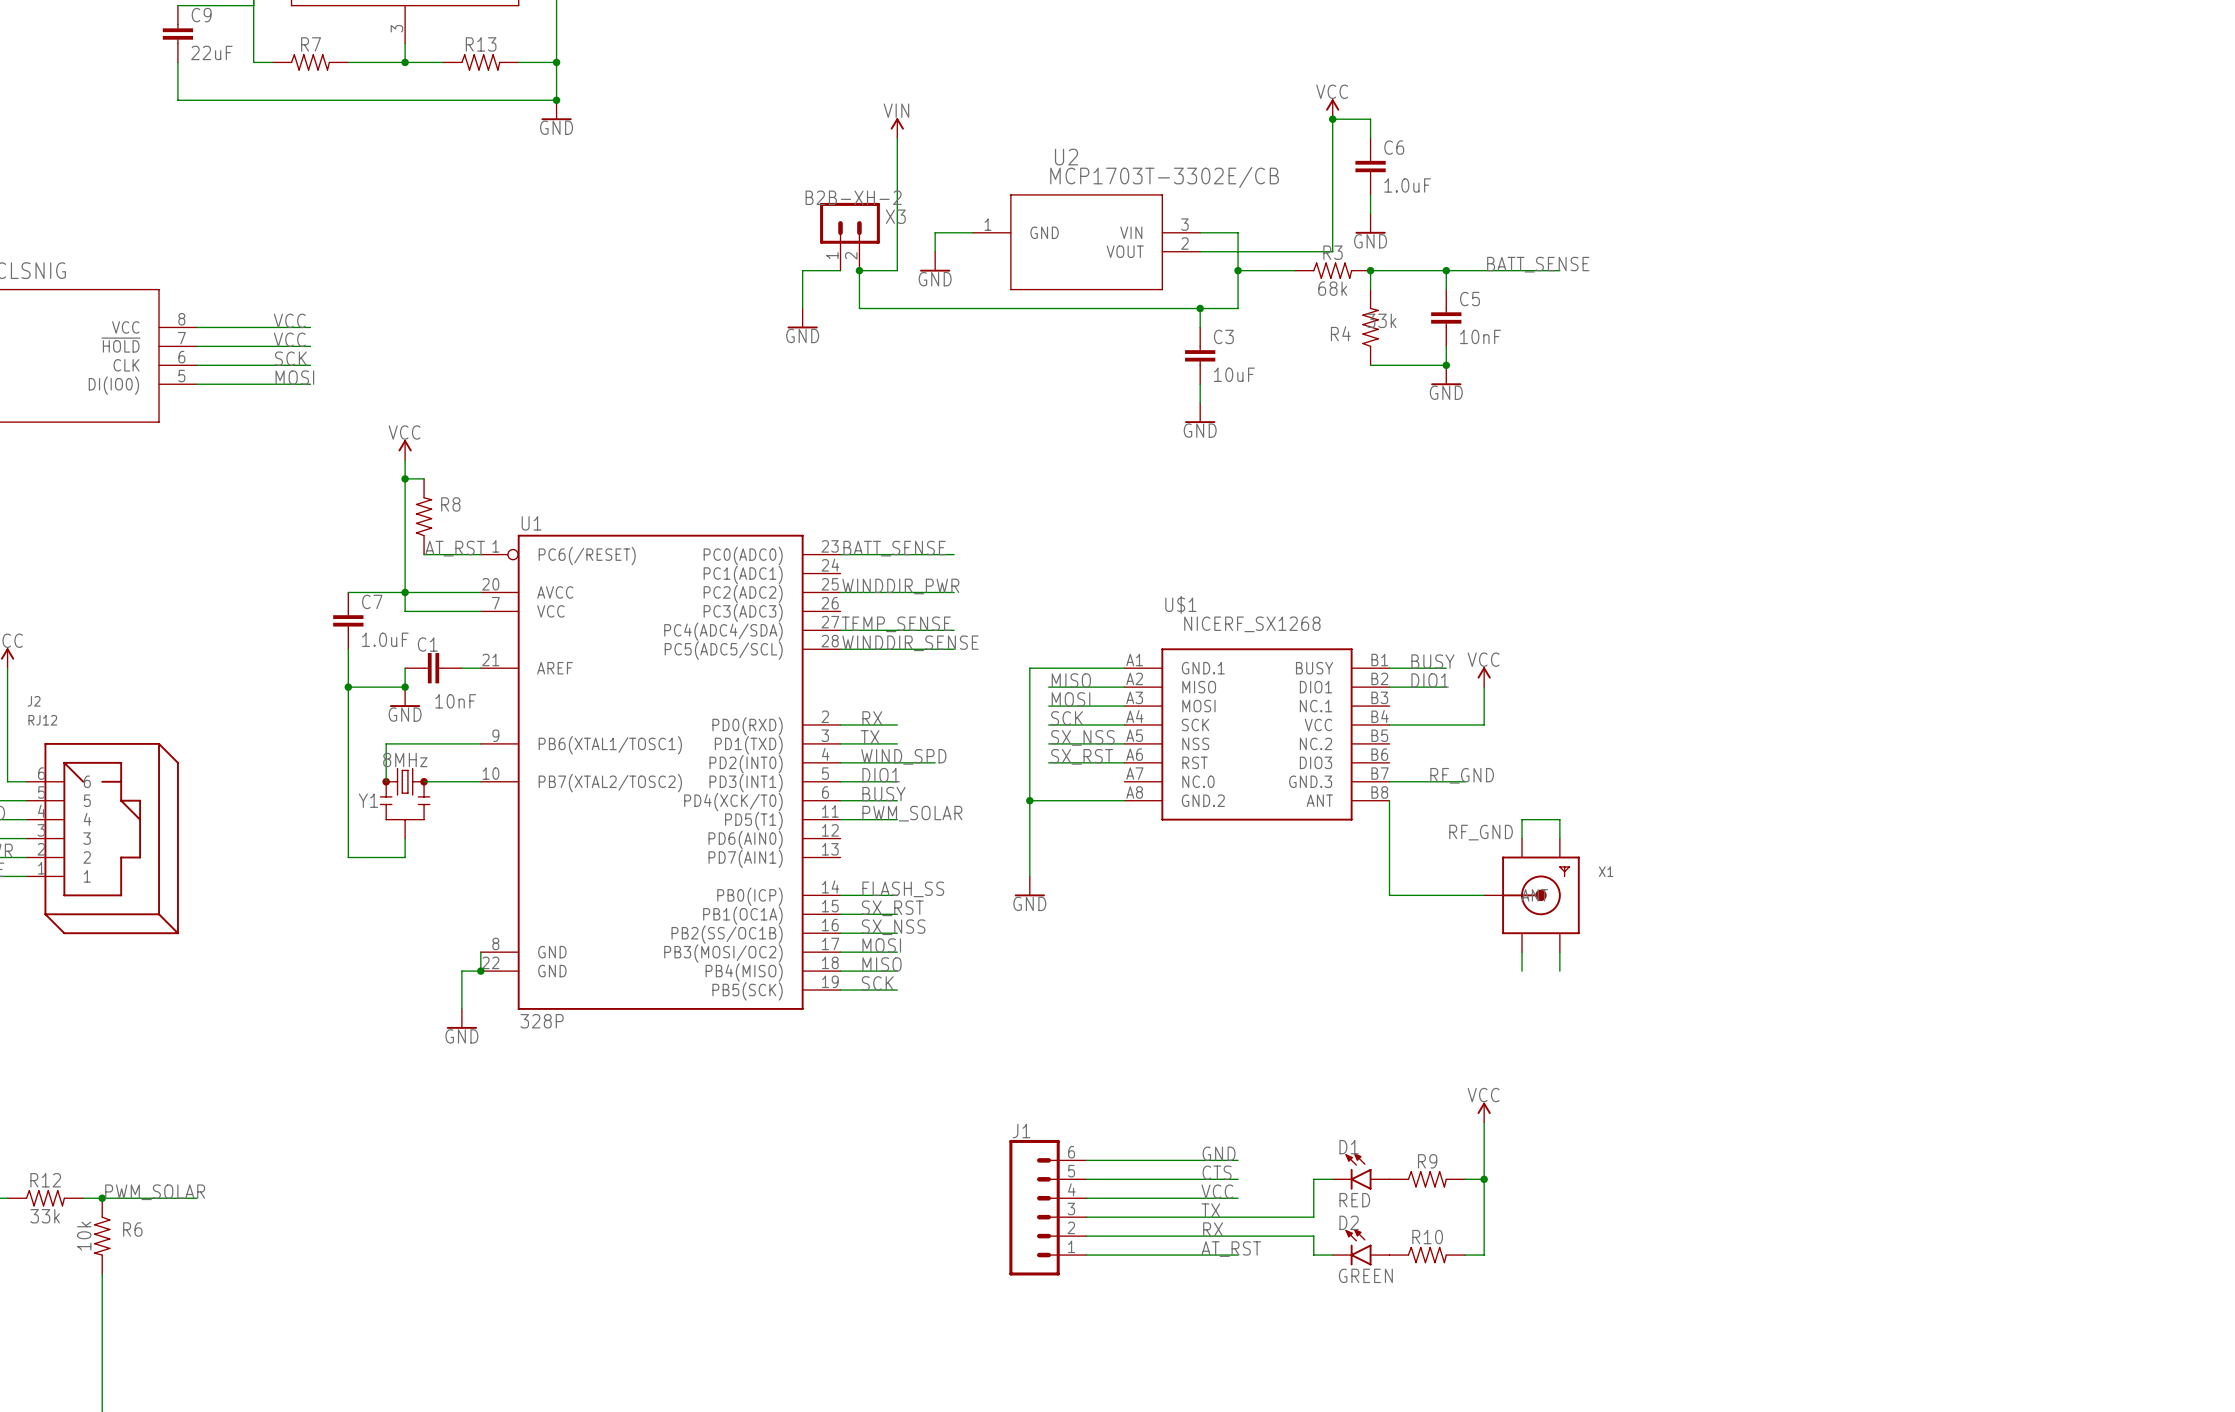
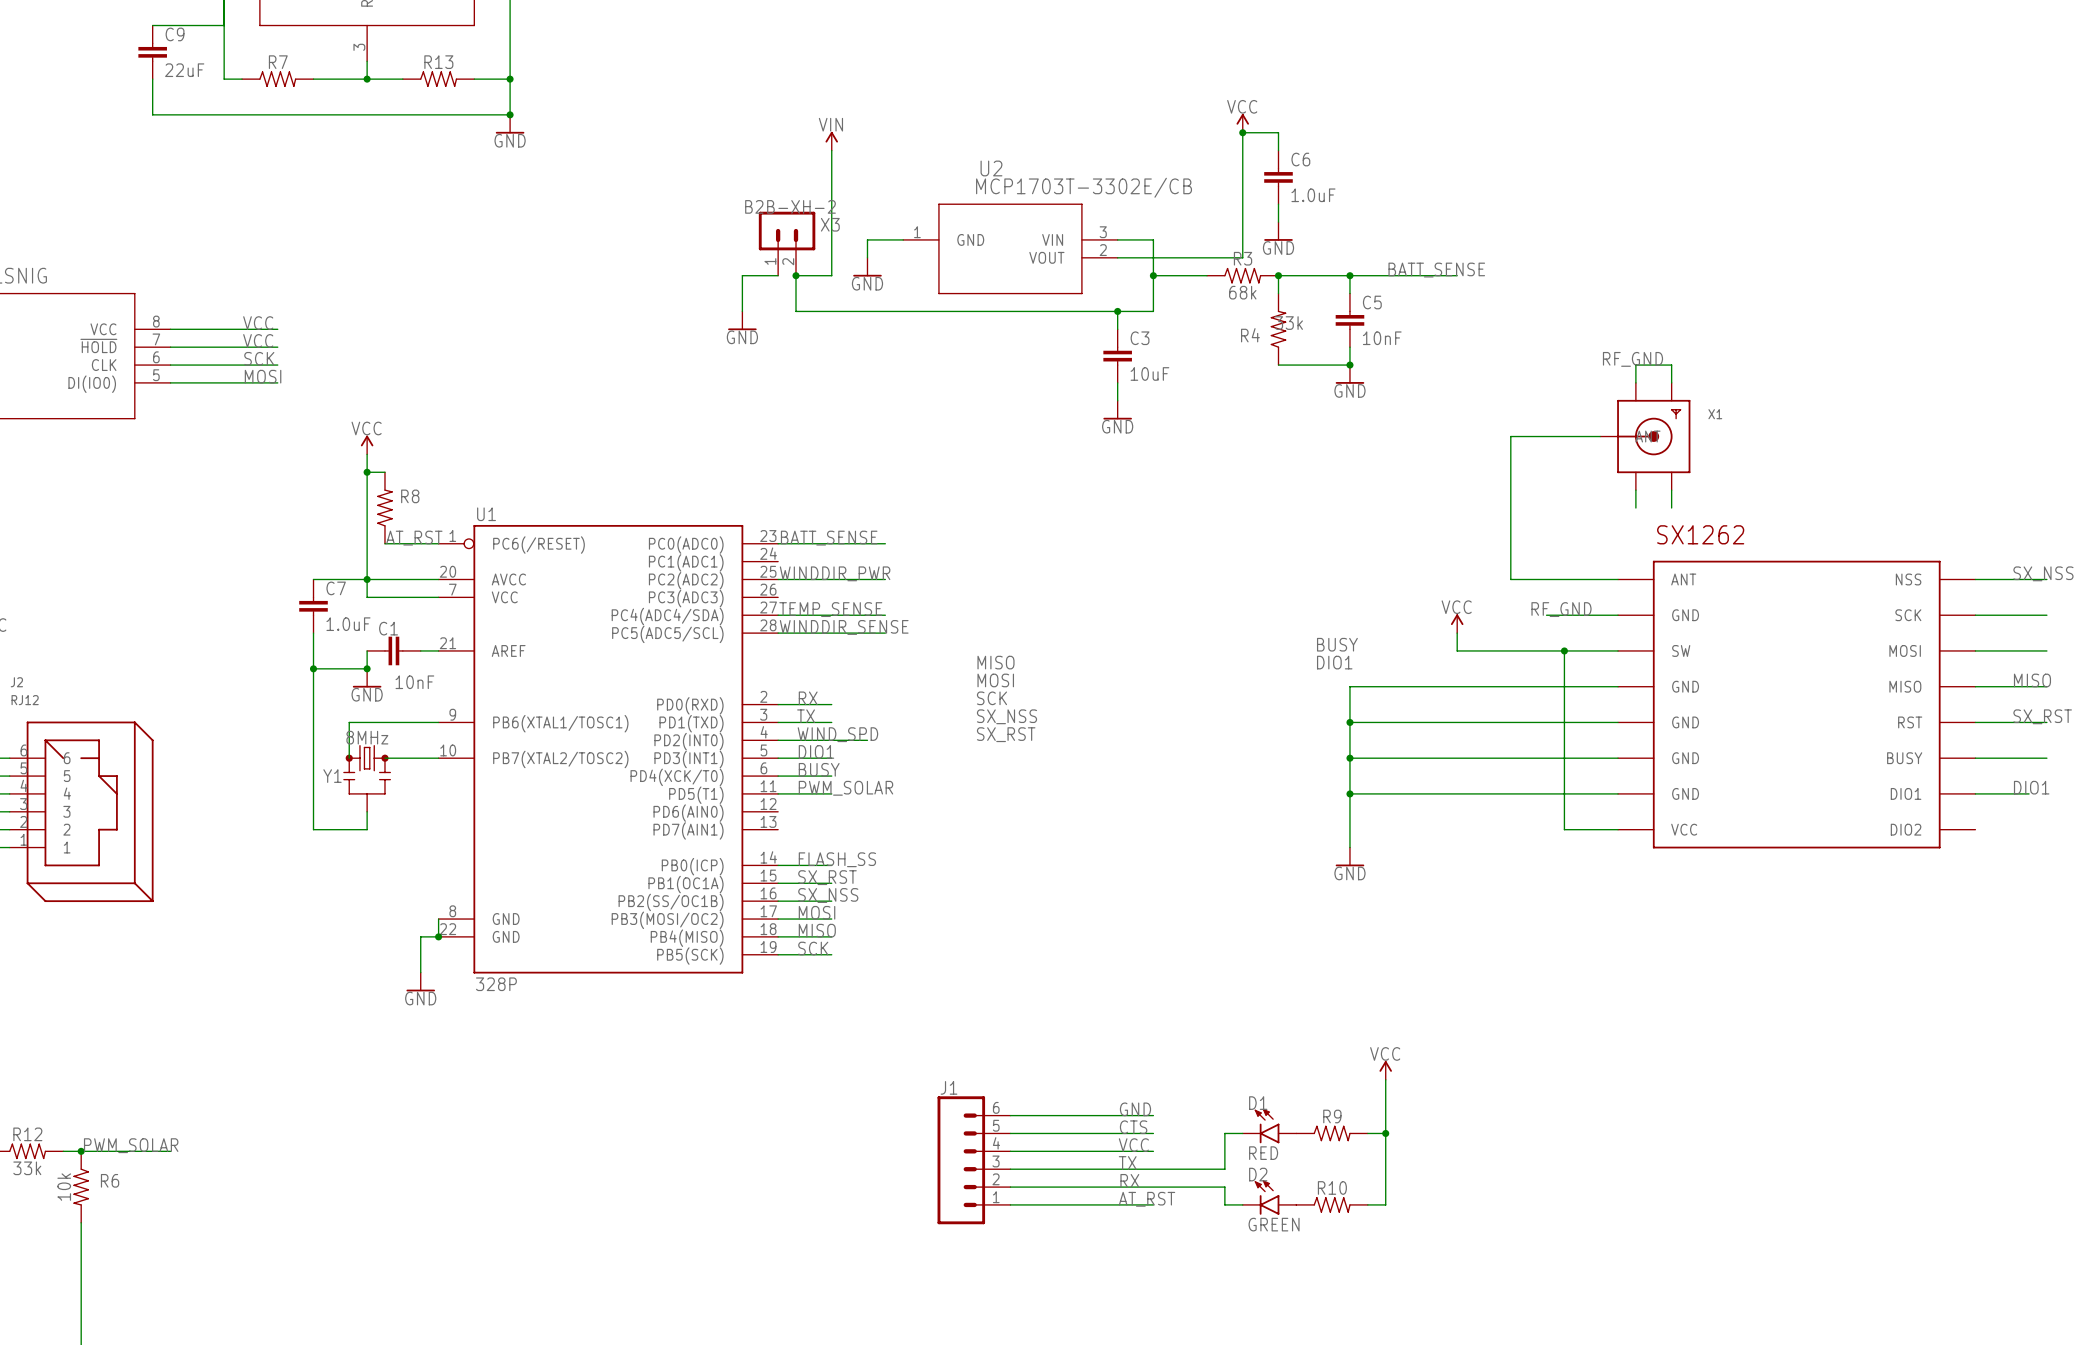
label: none -> RF_GND (1632, 359)
wire: none -> (1635, 382) (1635, 365) (1671, 365) (1671, 382)
wire: none -> (1600, 436) (1510, 436) (1510, 579) (1618, 579)
wire: none -> (1635, 490) (1635, 508)
wire: none -> (1671, 490) (1671, 508)
label: none -> SX_NSS (2043, 573)
wire: none -> (1975, 579) (2046, 579)
label: none -> RF_GND (1561, 609)
wire: none -> (1546, 615) (1618, 615)
wire: none -> (1975, 615) (2046, 615)
wire: none -> (1457, 633) (1457, 650) (1618, 650)
wire: (1124, 668) (1029, 668) (1029, 876) -> none
wire: (1389, 668) (1446, 668) -> none
wire: none -> (1564, 650) (1564, 829) (1618, 829)
junction: none -> (1564, 650)
wire: none -> (1975, 650) (2046, 650)
power symbol position: VCC (1484, 677) -> VCC (1457, 623)
wire: (1048, 687) (1124, 687) -> none
wire: (1389, 687) (1446, 687) -> none
wire: (1484, 687) (1484, 724) (1389, 724) -> none
label: none -> MISO (2032, 680)
wire: (1048, 706) (1124, 706) -> none
wire: none -> (1618, 686) (1349, 686) (1349, 847)
wire: none -> (1975, 686) (2046, 686)
wire: (1048, 724) (1124, 724) -> none
part: none -> (1796, 704)
U$1: NICERF_SX1268 (1256, 734) -> none
label: none -> SX_RST (2042, 716)
wire: (1048, 743) (1124, 743) -> none
wire: none -> (1349, 722) (1618, 722)
junction: none -> (1349, 722)
wire: none -> (1975, 722) (2046, 722)
wire: (1048, 762) (1124, 762) -> none
label: RF_GND (1462, 775) -> none
wire: (1389, 781) (1446, 781) -> none
junction: none -> (1349, 758)
wire: none -> (1367, 758) (1618, 758)
wire: none -> (1975, 758) (2046, 758)
wire: (1029, 800) (1124, 800) -> none
junction: (1029, 800) -> none
wire: (1389, 800) (1389, 895) (1484, 895) -> none
label: none -> DIO1 (2031, 787)
junction: none -> (1349, 793)
wire: (1522, 819) (1522, 838) -> (1421, 793) (1349, 793)
wire: (1559, 819) (1559, 838) -> (1457, 793) (1618, 793)
wire: none -> (1975, 793) (2029, 793)
label: RF_GND (1481, 832) -> none
power symbol: GND (1029, 886) -> none
power symbol: none -> GND (1349, 856)
X1 position: (1531, 895) -> (1645, 436)
wire: (1522, 952) (1522, 971) -> none
wire: (1559, 952) (1559, 971) -> none

